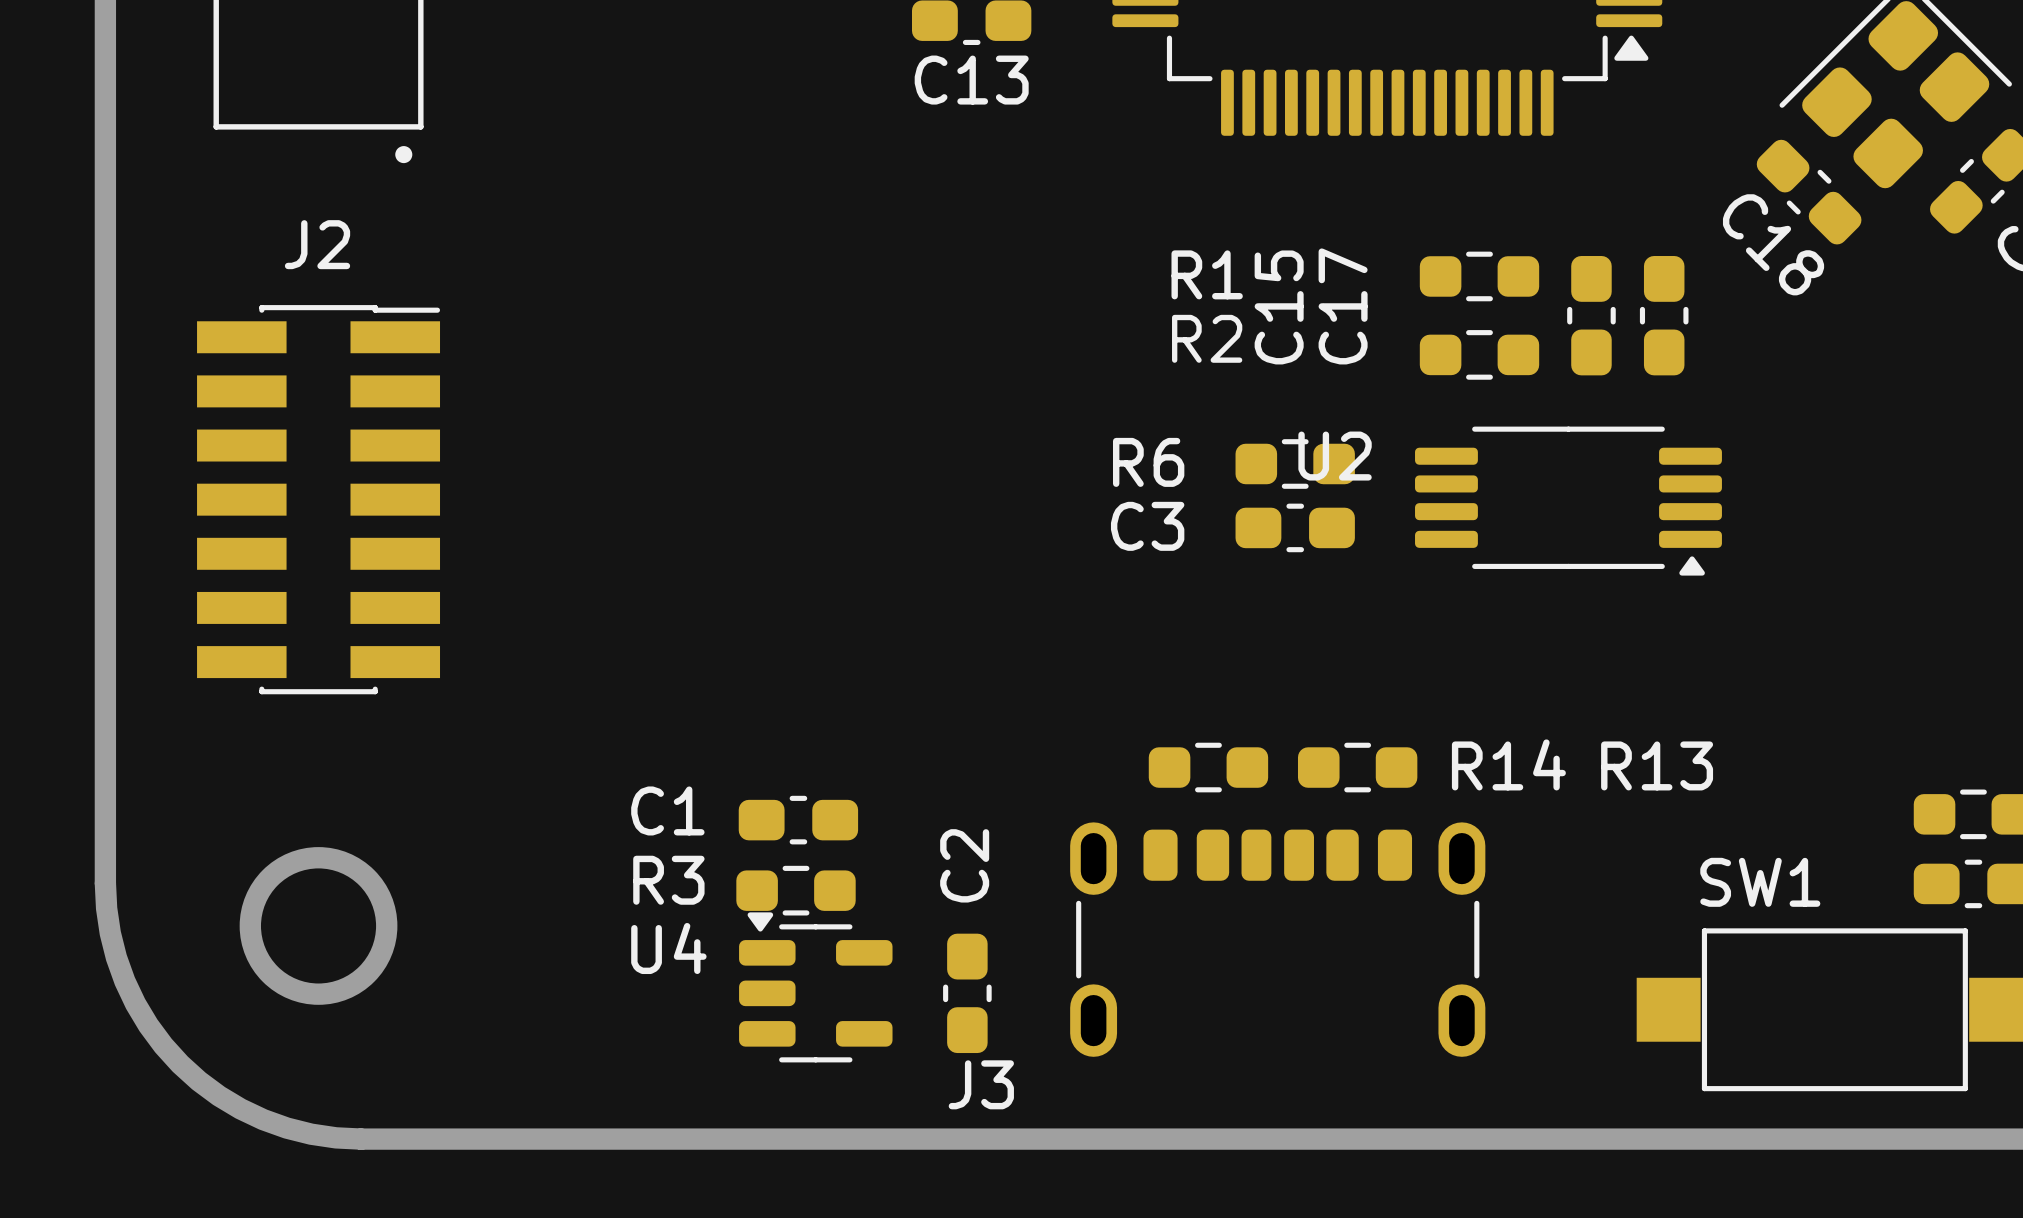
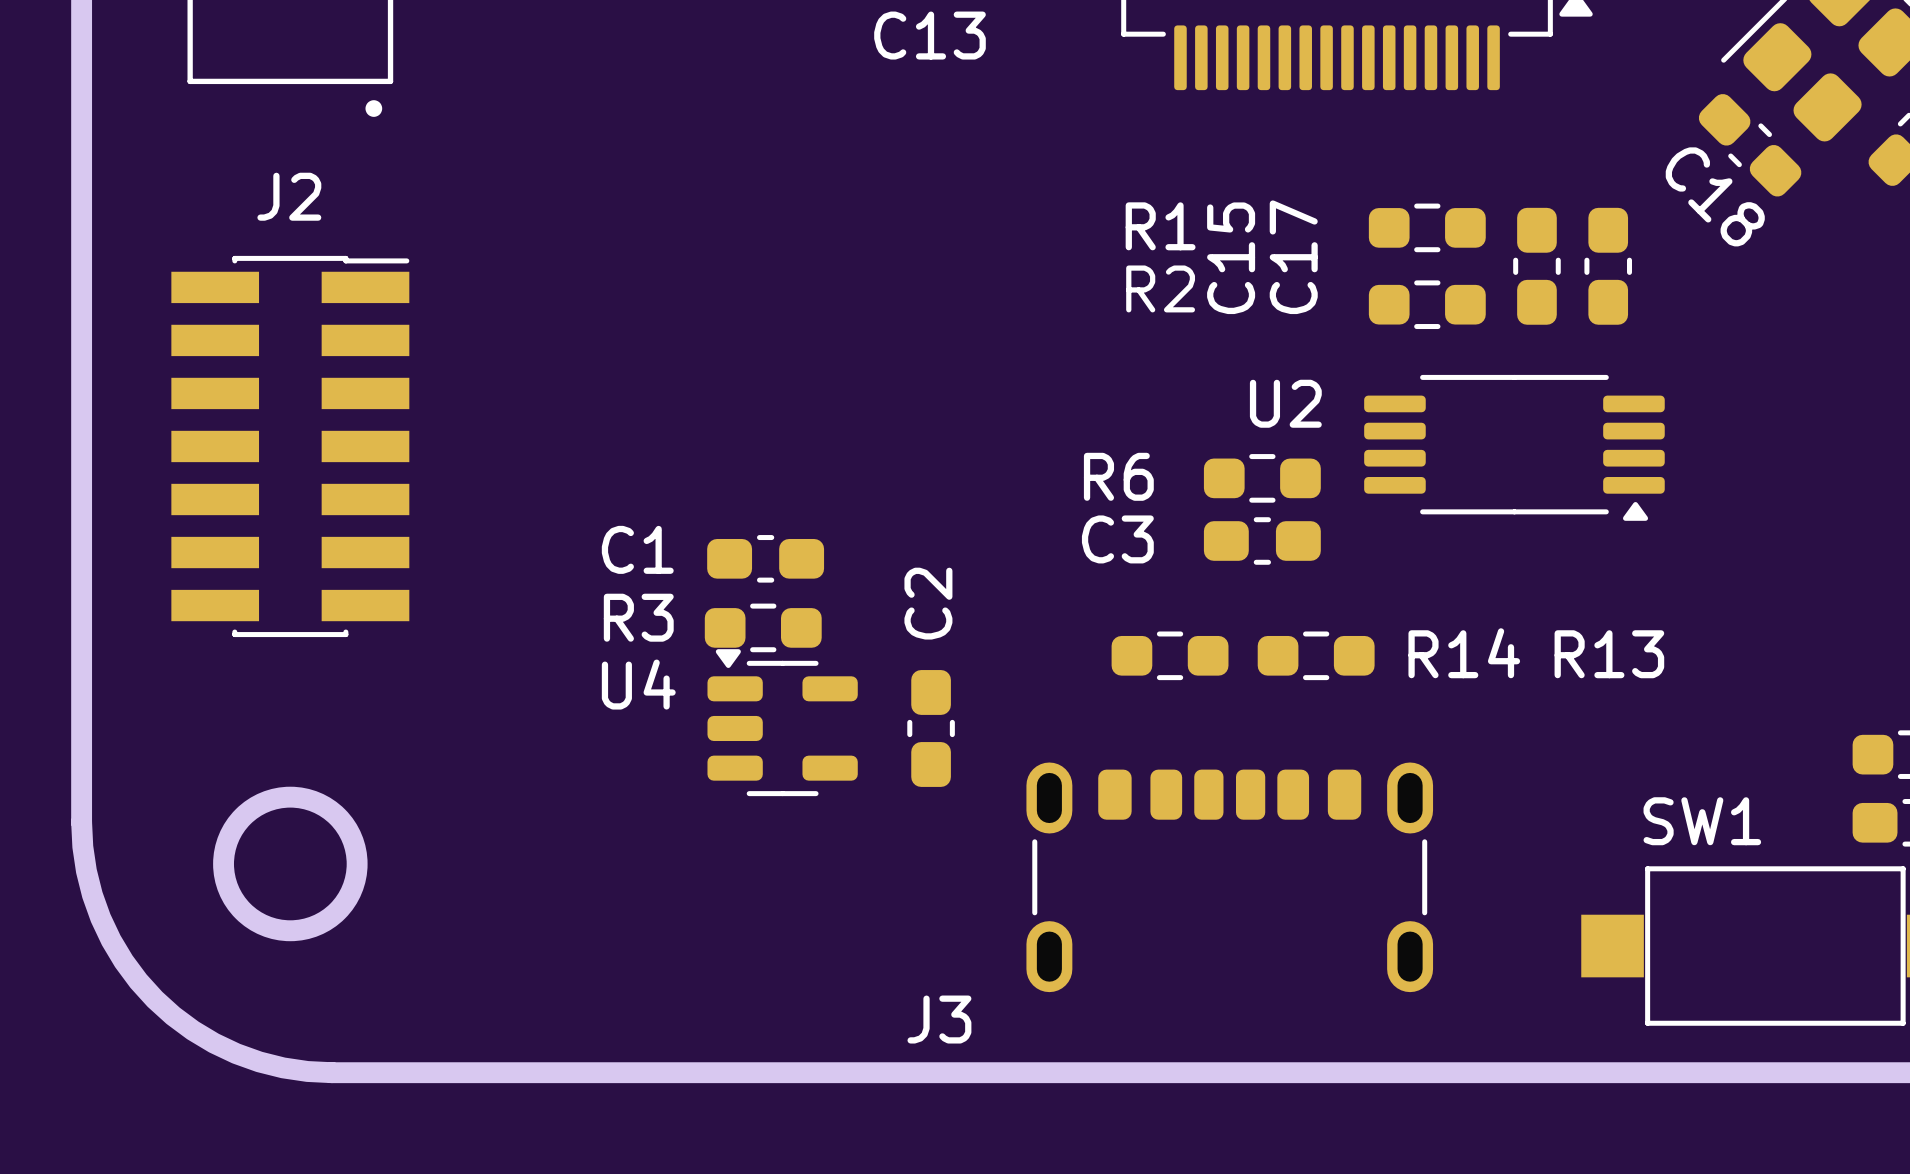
R6 position: (1295, 463) -> (1262, 478)
C3 position: (1295, 527) -> (1262, 540)
R14 position: (1208, 767) -> (1170, 655)
R13 position: (1357, 767) -> (1316, 655)
C1 position: (798, 820) -> (765, 558)
R3 position: (796, 890) -> (763, 627)
U4 position: (815, 987) -> (782, 722)
C2 position: (967, 993) -> (931, 728)

